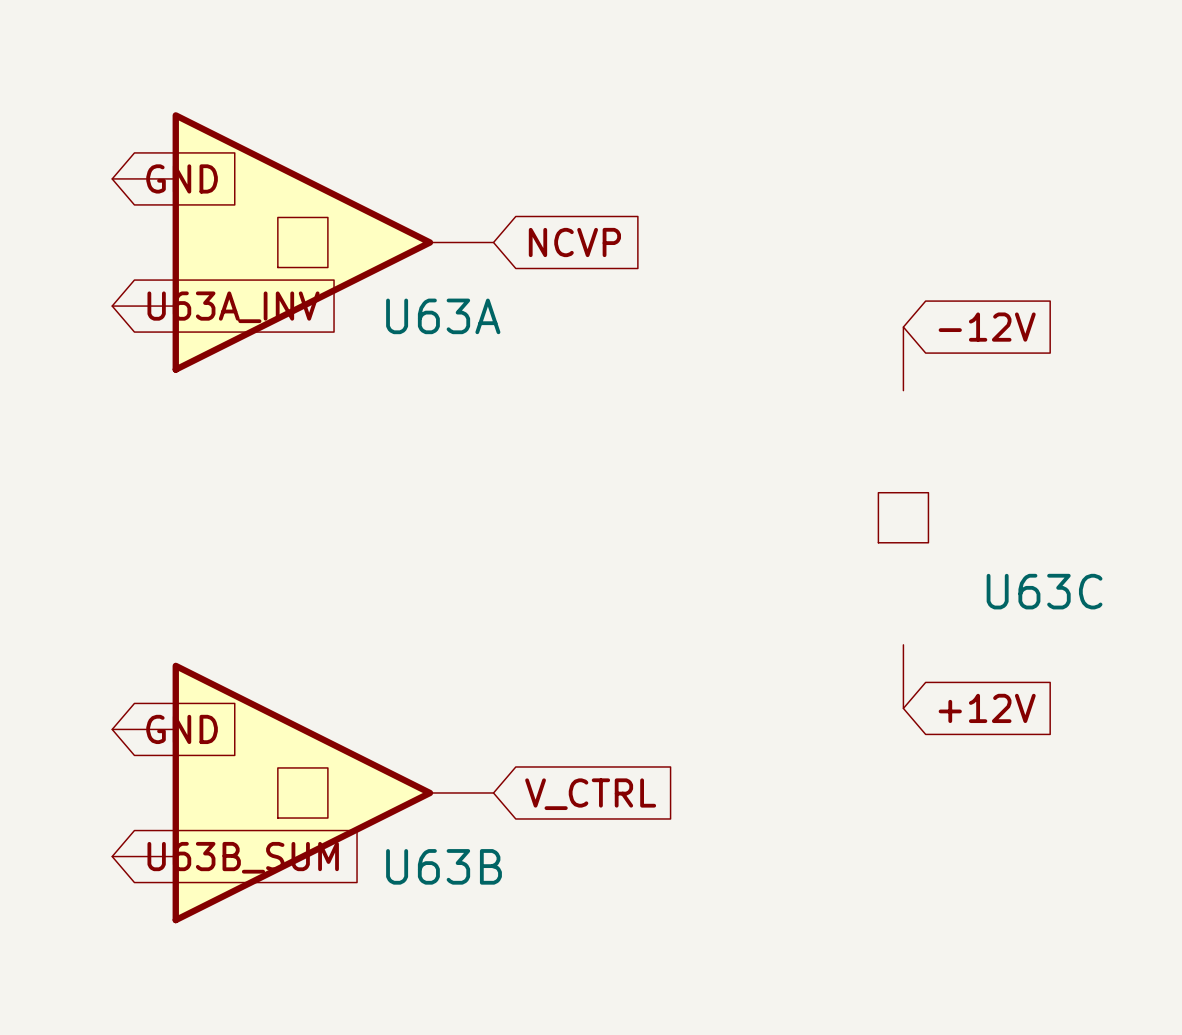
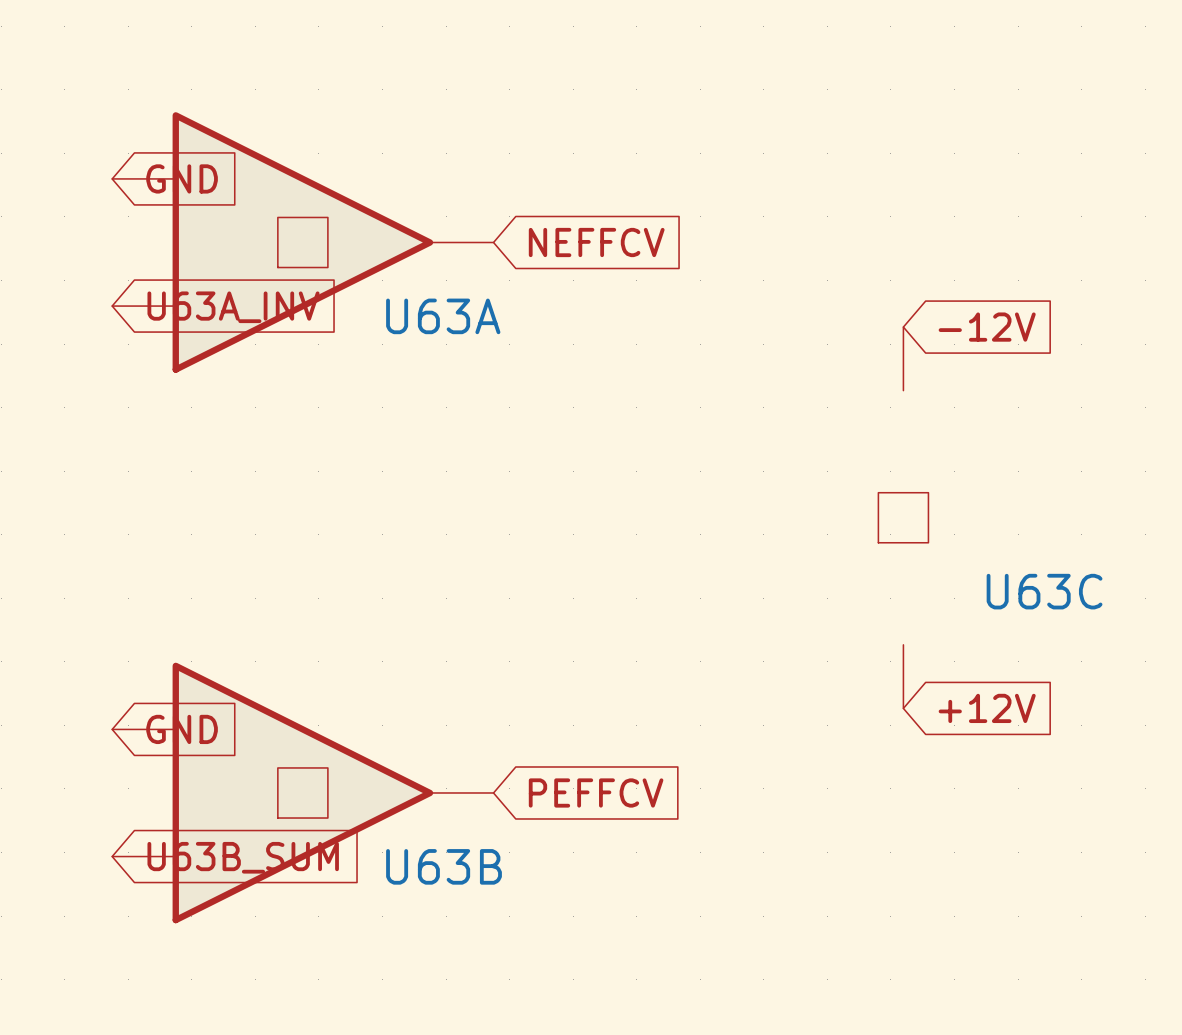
global label: NCVP (574, 242) -> NEFFCV (596, 242)
global label: V_CTRL (590, 794) -> PEFFCV (596, 792)

